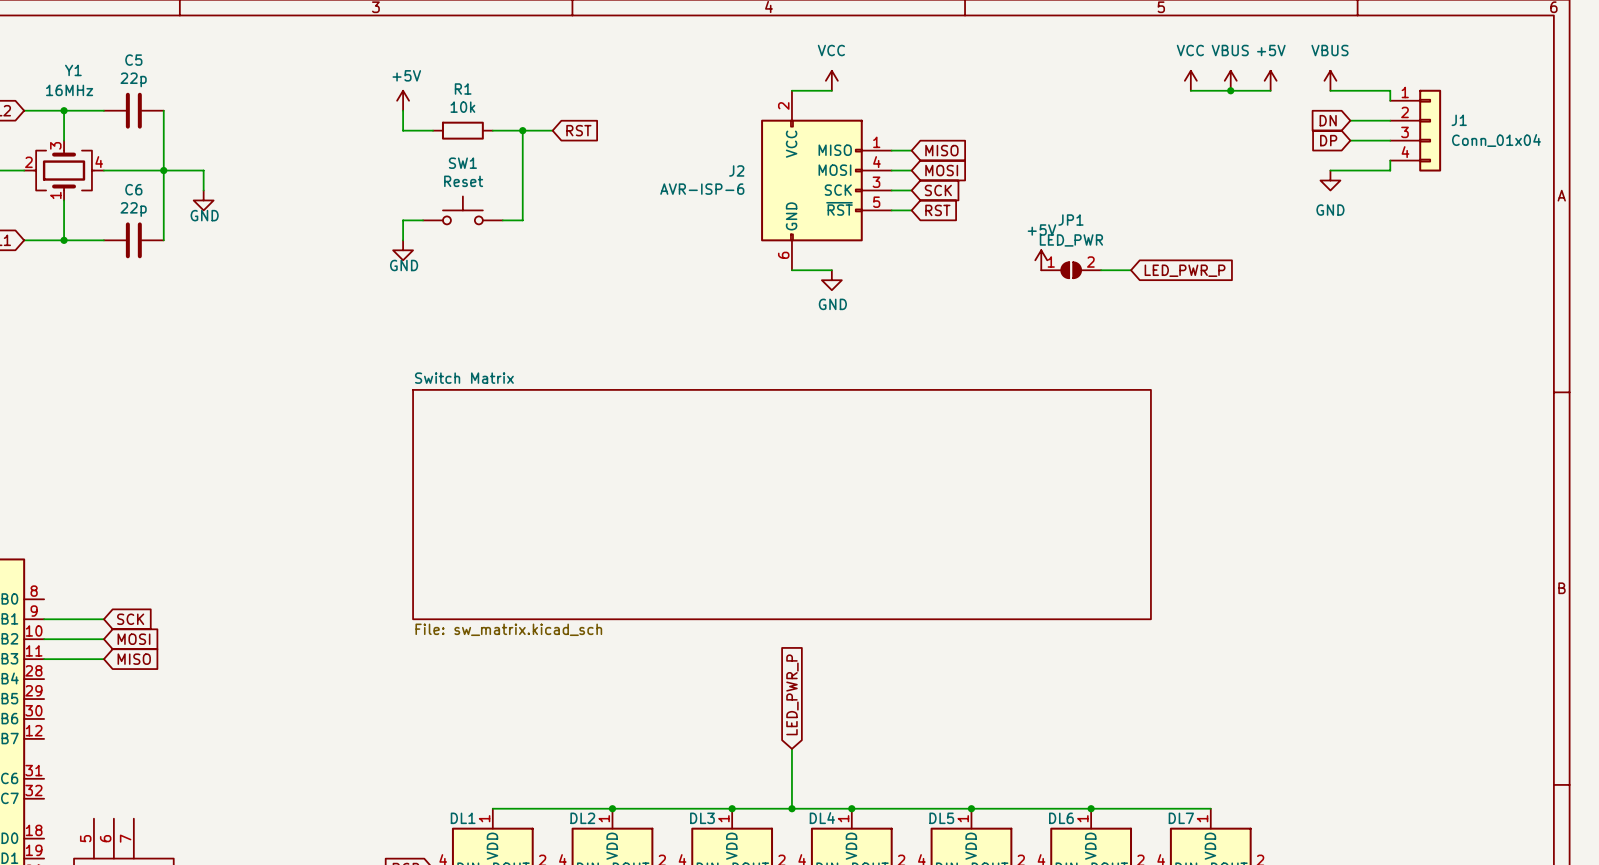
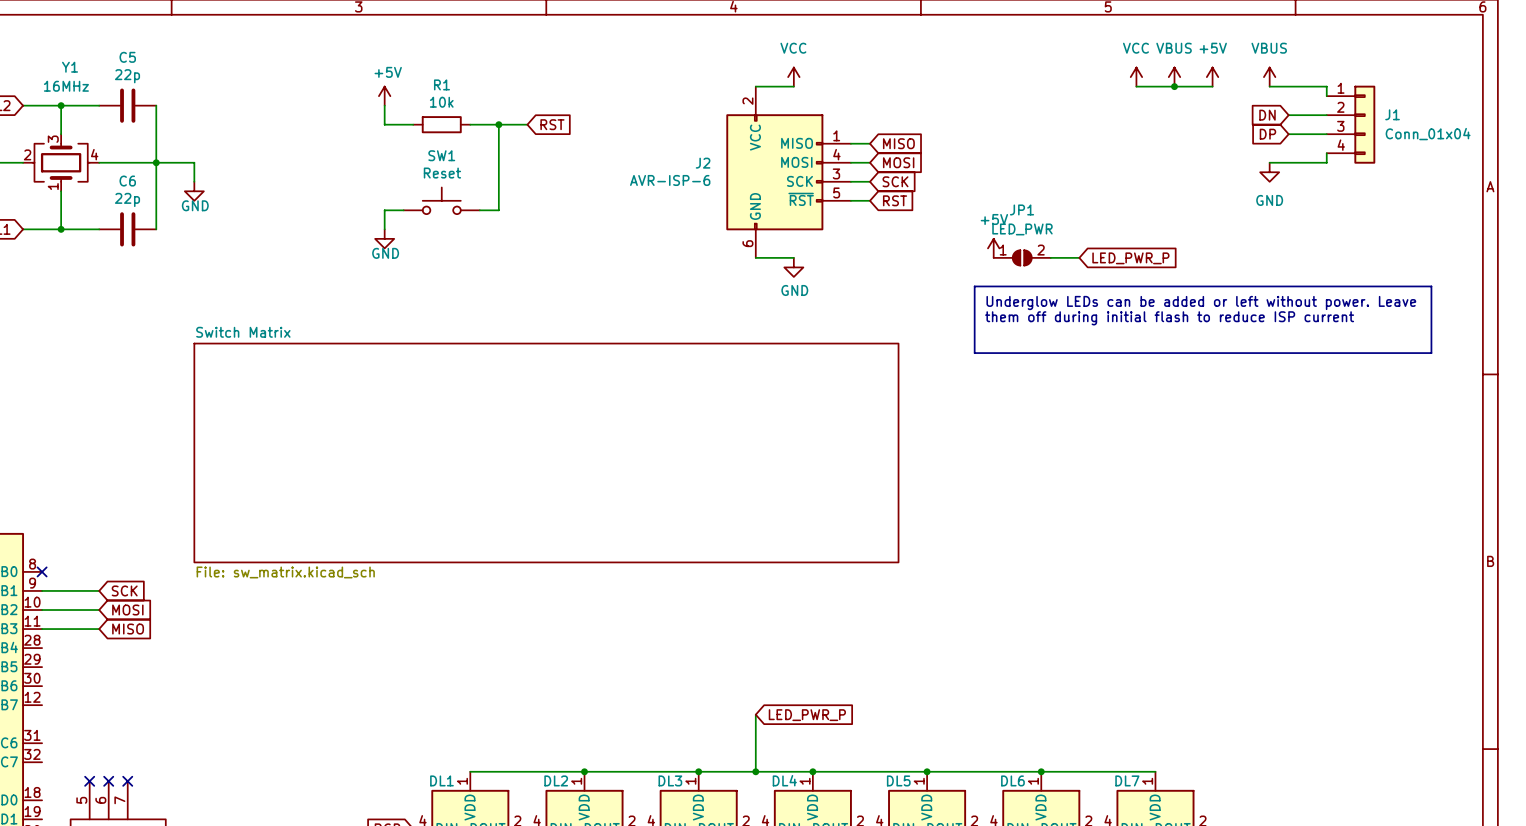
line: none -> (974, 286) (1431, 286) (1431, 353) (974, 353) (974, 286)
text: none -> Underglow LEDs can be added or left without power. Leave (1201, 302)
text: none -> them off during initial flash to reduce ISP current (1169, 318)
sheet Switch Matrix: none -> File: sw_matrix.kicad_sch (546, 452)
sheet Switch Matrix: File: sw_matrix.kicad_sch (782, 504) -> none
no-connect mark: none -> (42, 571)
global label rotation: 0° (792, 694) -> 90° clockwise (807, 715)
no-connect mark: none -> (89, 781)
no-connect mark: none -> (108, 781)
no-connect mark: none -> (127, 781)

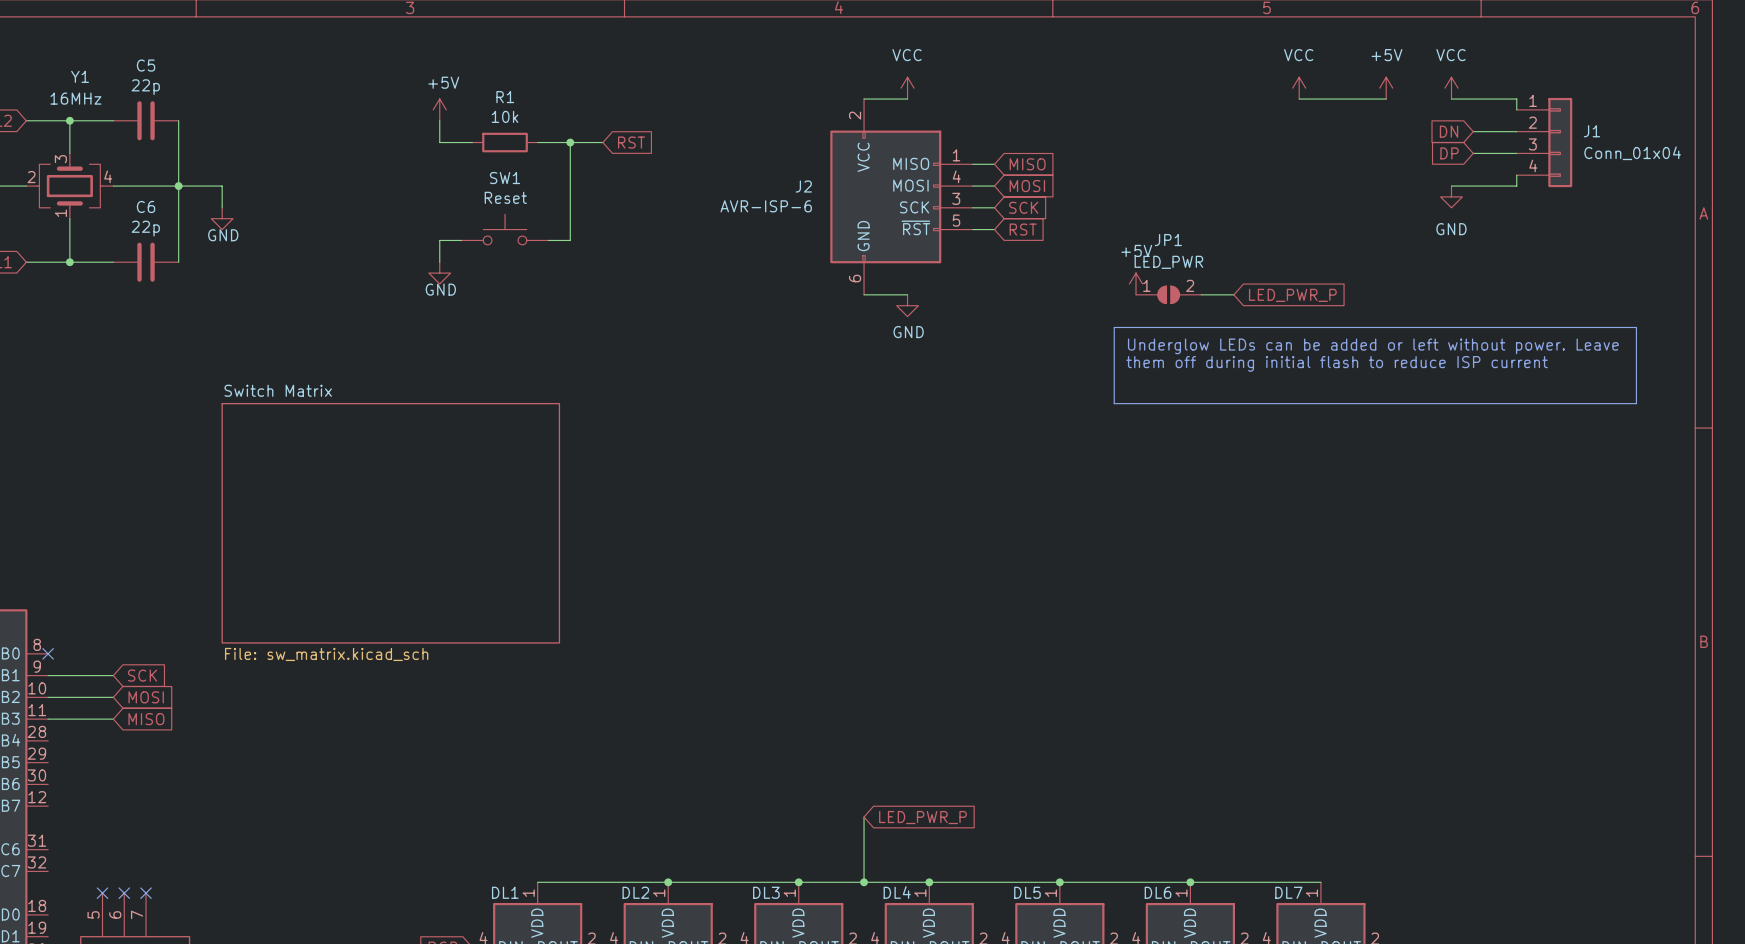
power symbol: VBUS (1174, 77) -> none
power symbol: VBUS (1269, 77) -> VCC (1451, 88)
junction: (1174, 86) -> none
sheet Switch Matrix: File: sw_matrix.kicad_sch (546, 452) -> none
sheet Switch Matrix: none -> File: sw_matrix.kicad_sch (390, 523)

